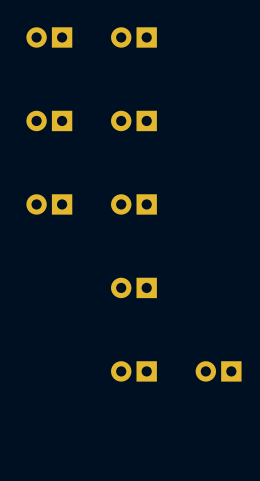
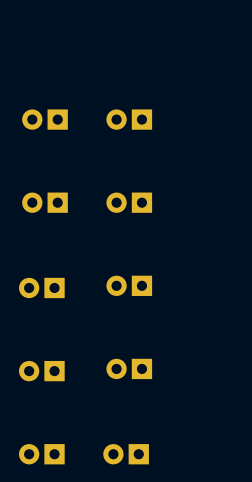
part: (49, 37) -> none
part: (133, 37) -> none
part: none -> (41, 287)
part: (218, 371) -> none
part: none -> (41, 371)
part: none -> (41, 454)
part: none -> (126, 454)

